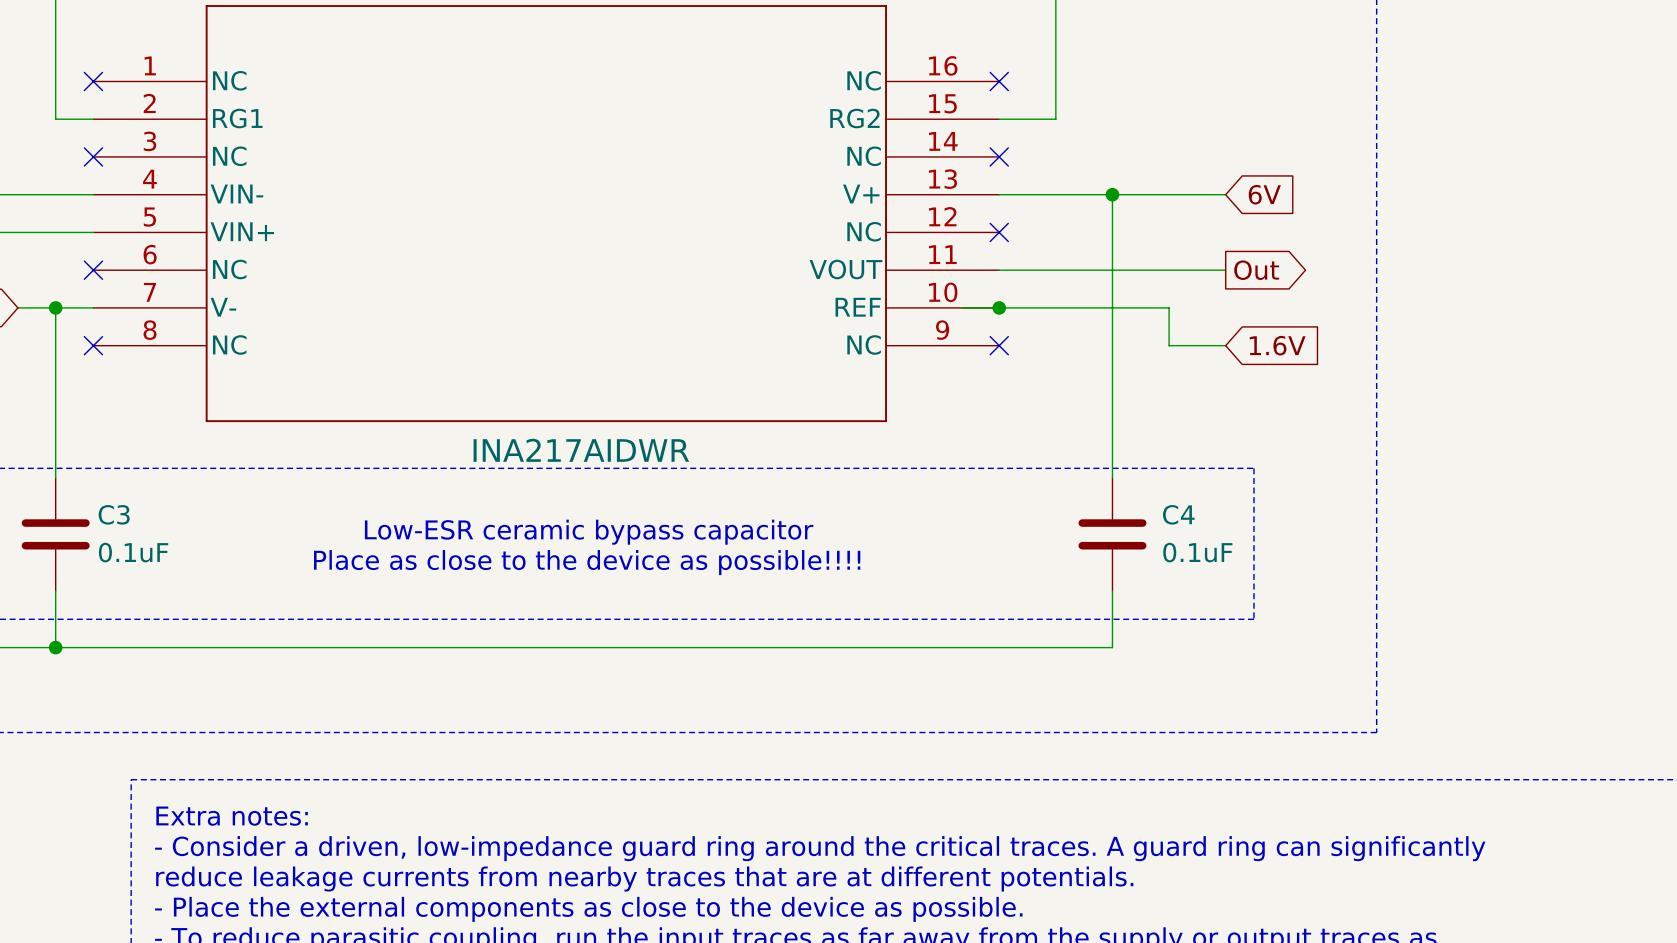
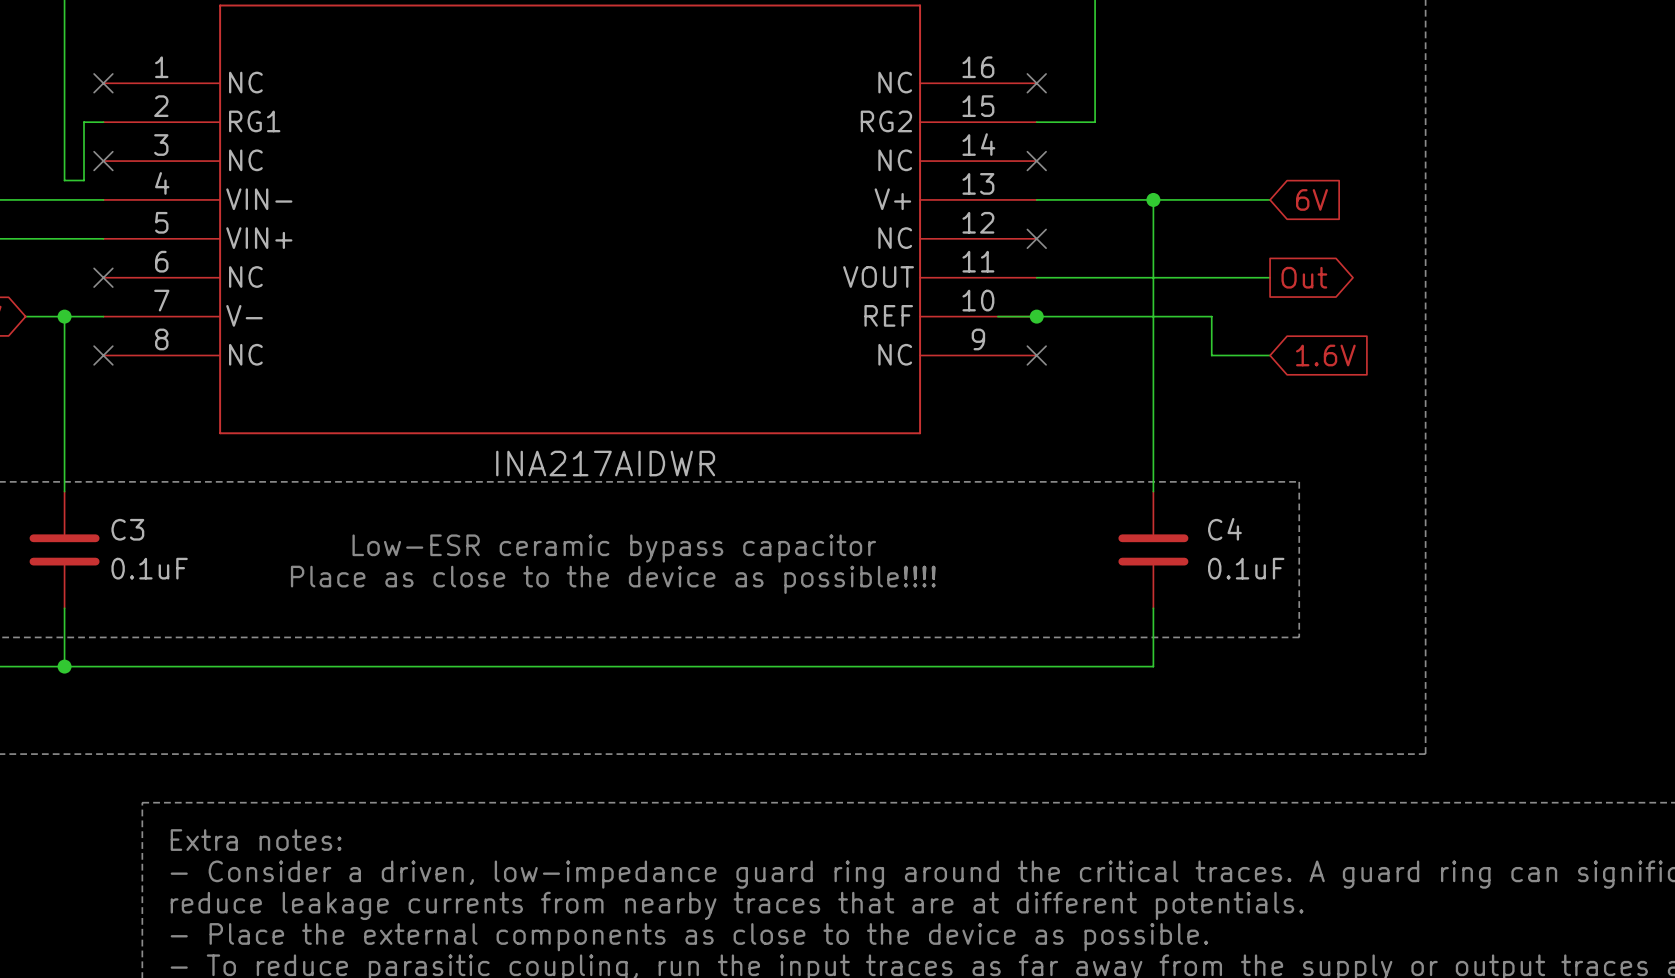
wire: (55, 119) (74, 119) -> (64, 122) (64, 180) (84, 180) (84, 122)

